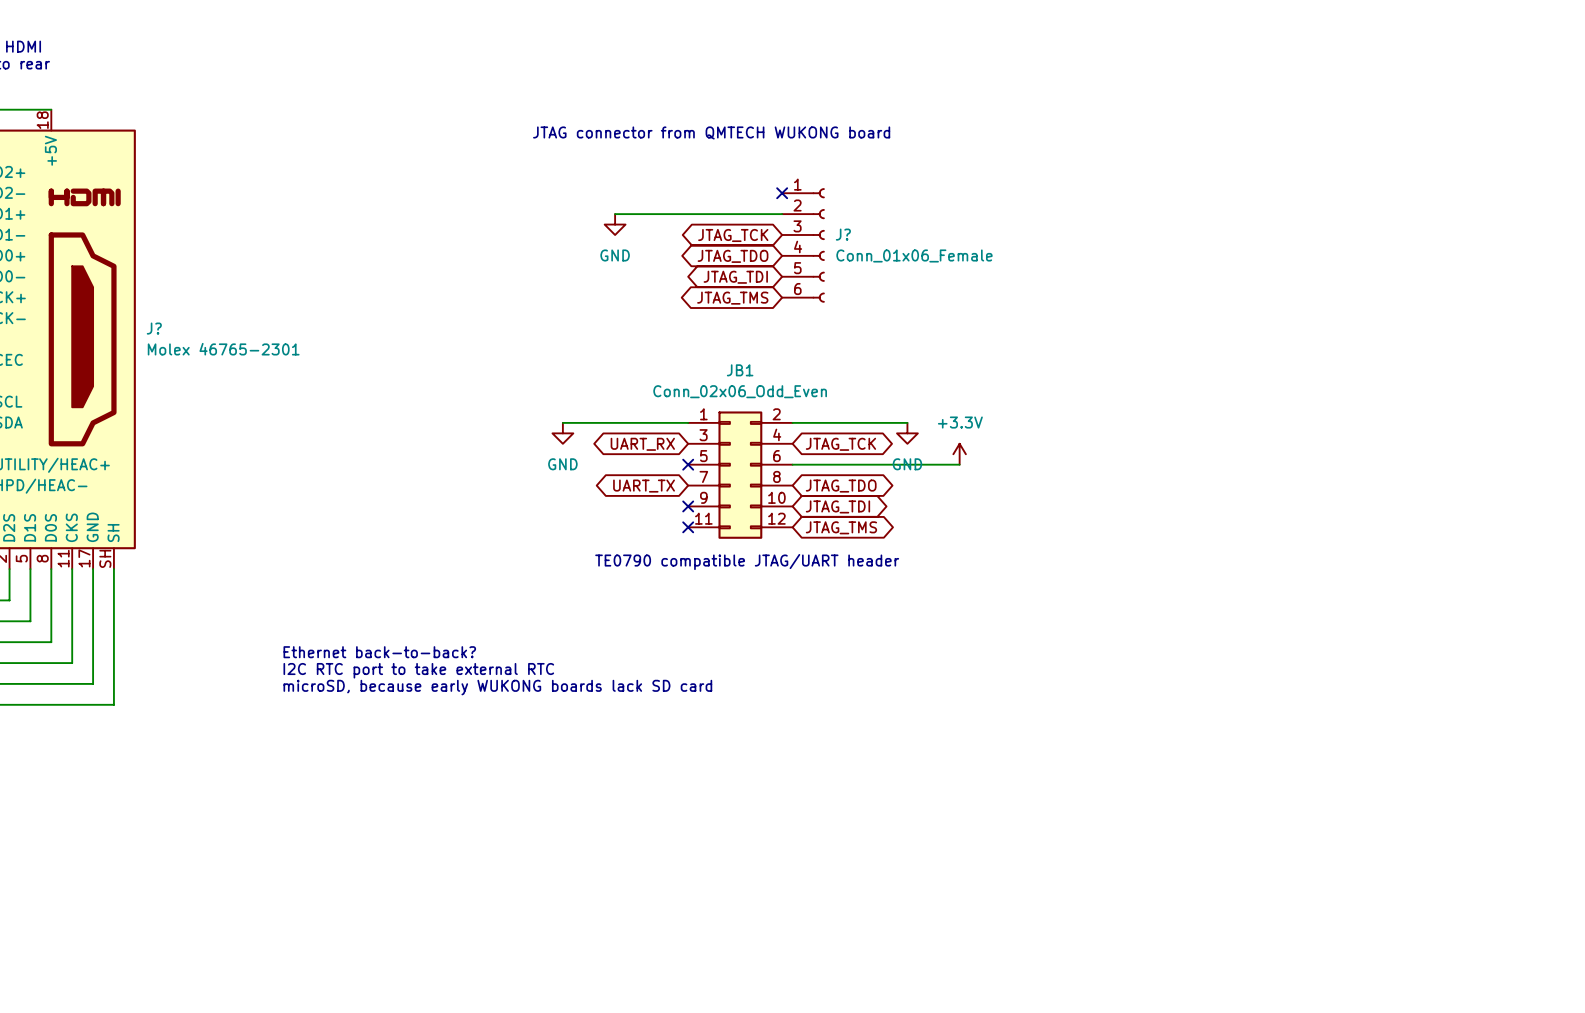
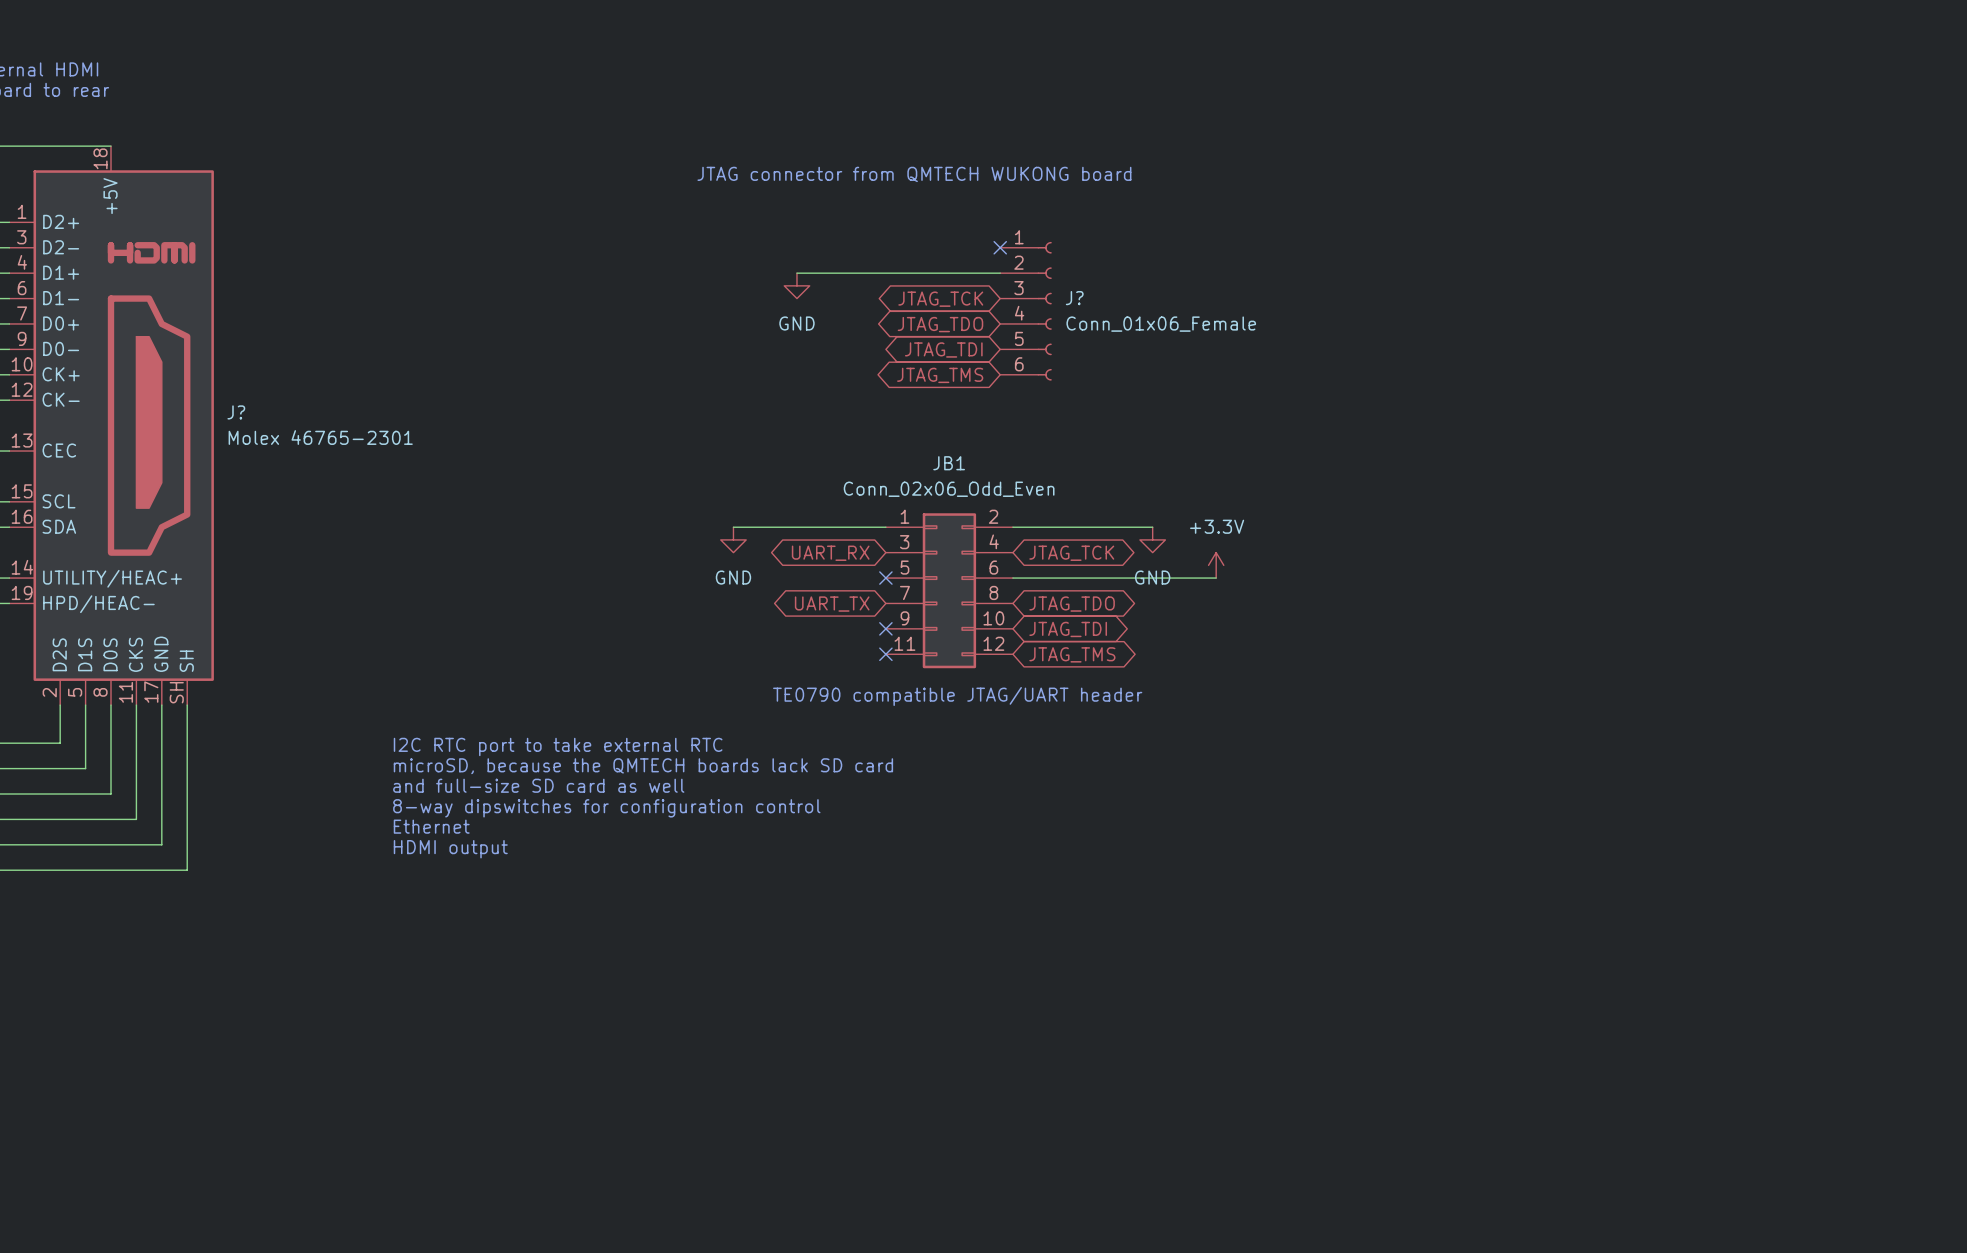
text: none -> I2C RTC port to take external RTC (558, 746)
text: none -> microSD, because the QMTECH boards lack SD card (643, 766)
text: none -> and full-size SD card as well (538, 785)
text: Ethernet back-to-back? (379, 652) -> 8-way dipswitches for configuration control (606, 808)
text: I2C RTC port to take external RTC (418, 670) -> Ethernet (431, 826)
text: microSD, because early WUKONG boards lack SD card (497, 687) -> HDMI output (450, 849)

